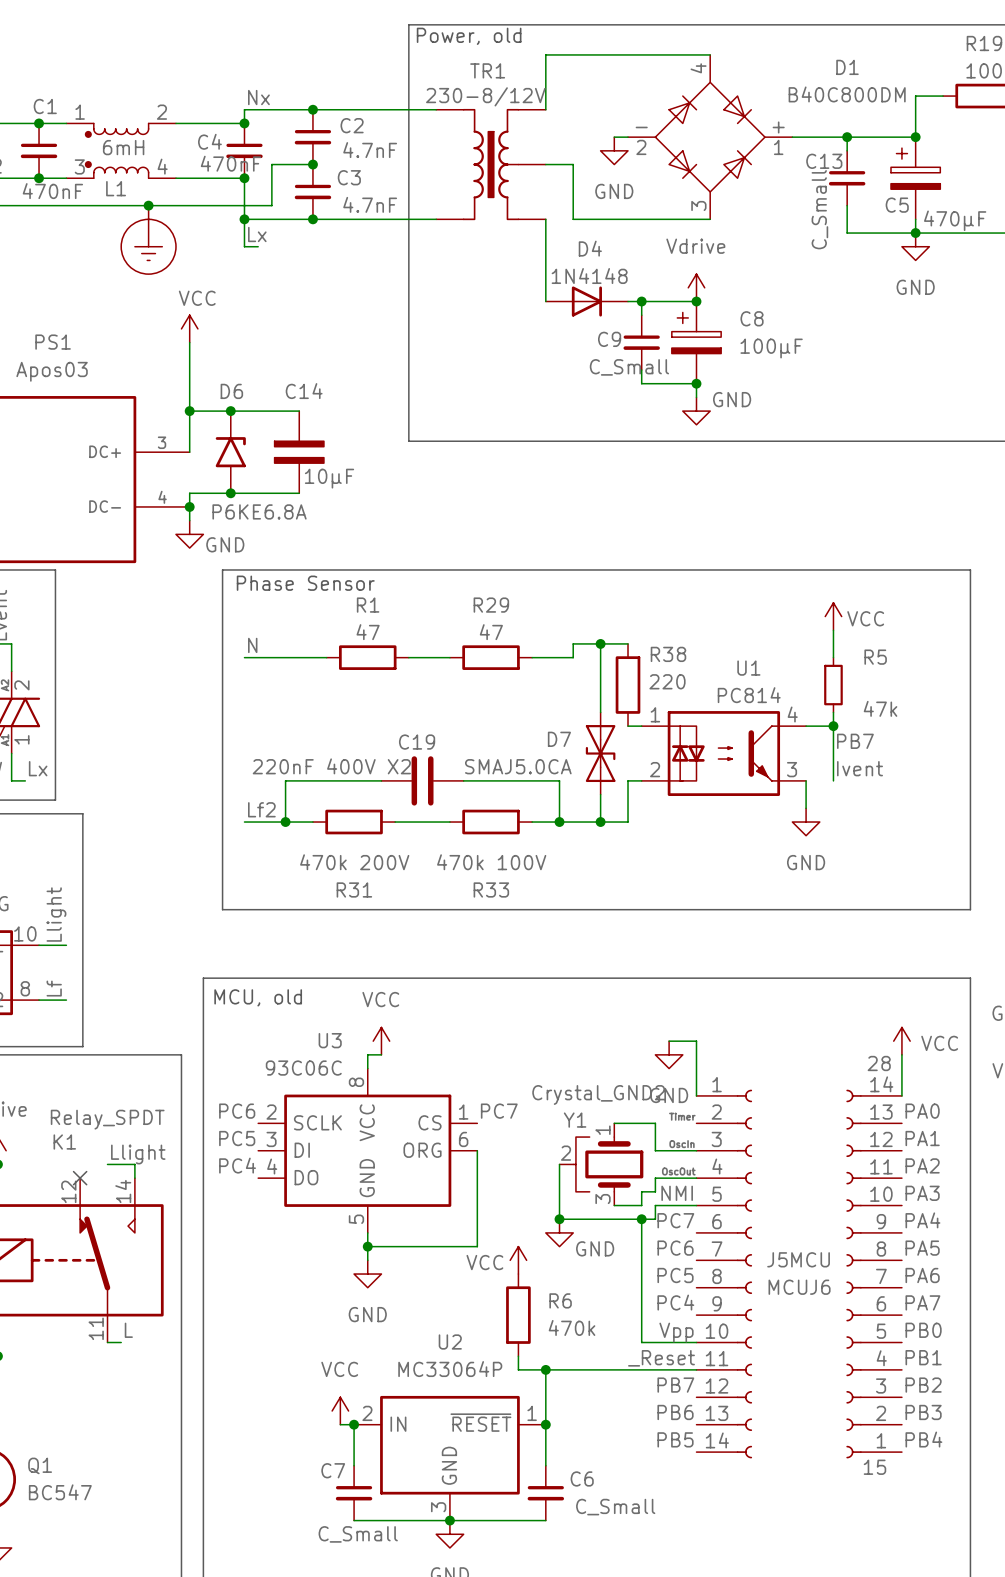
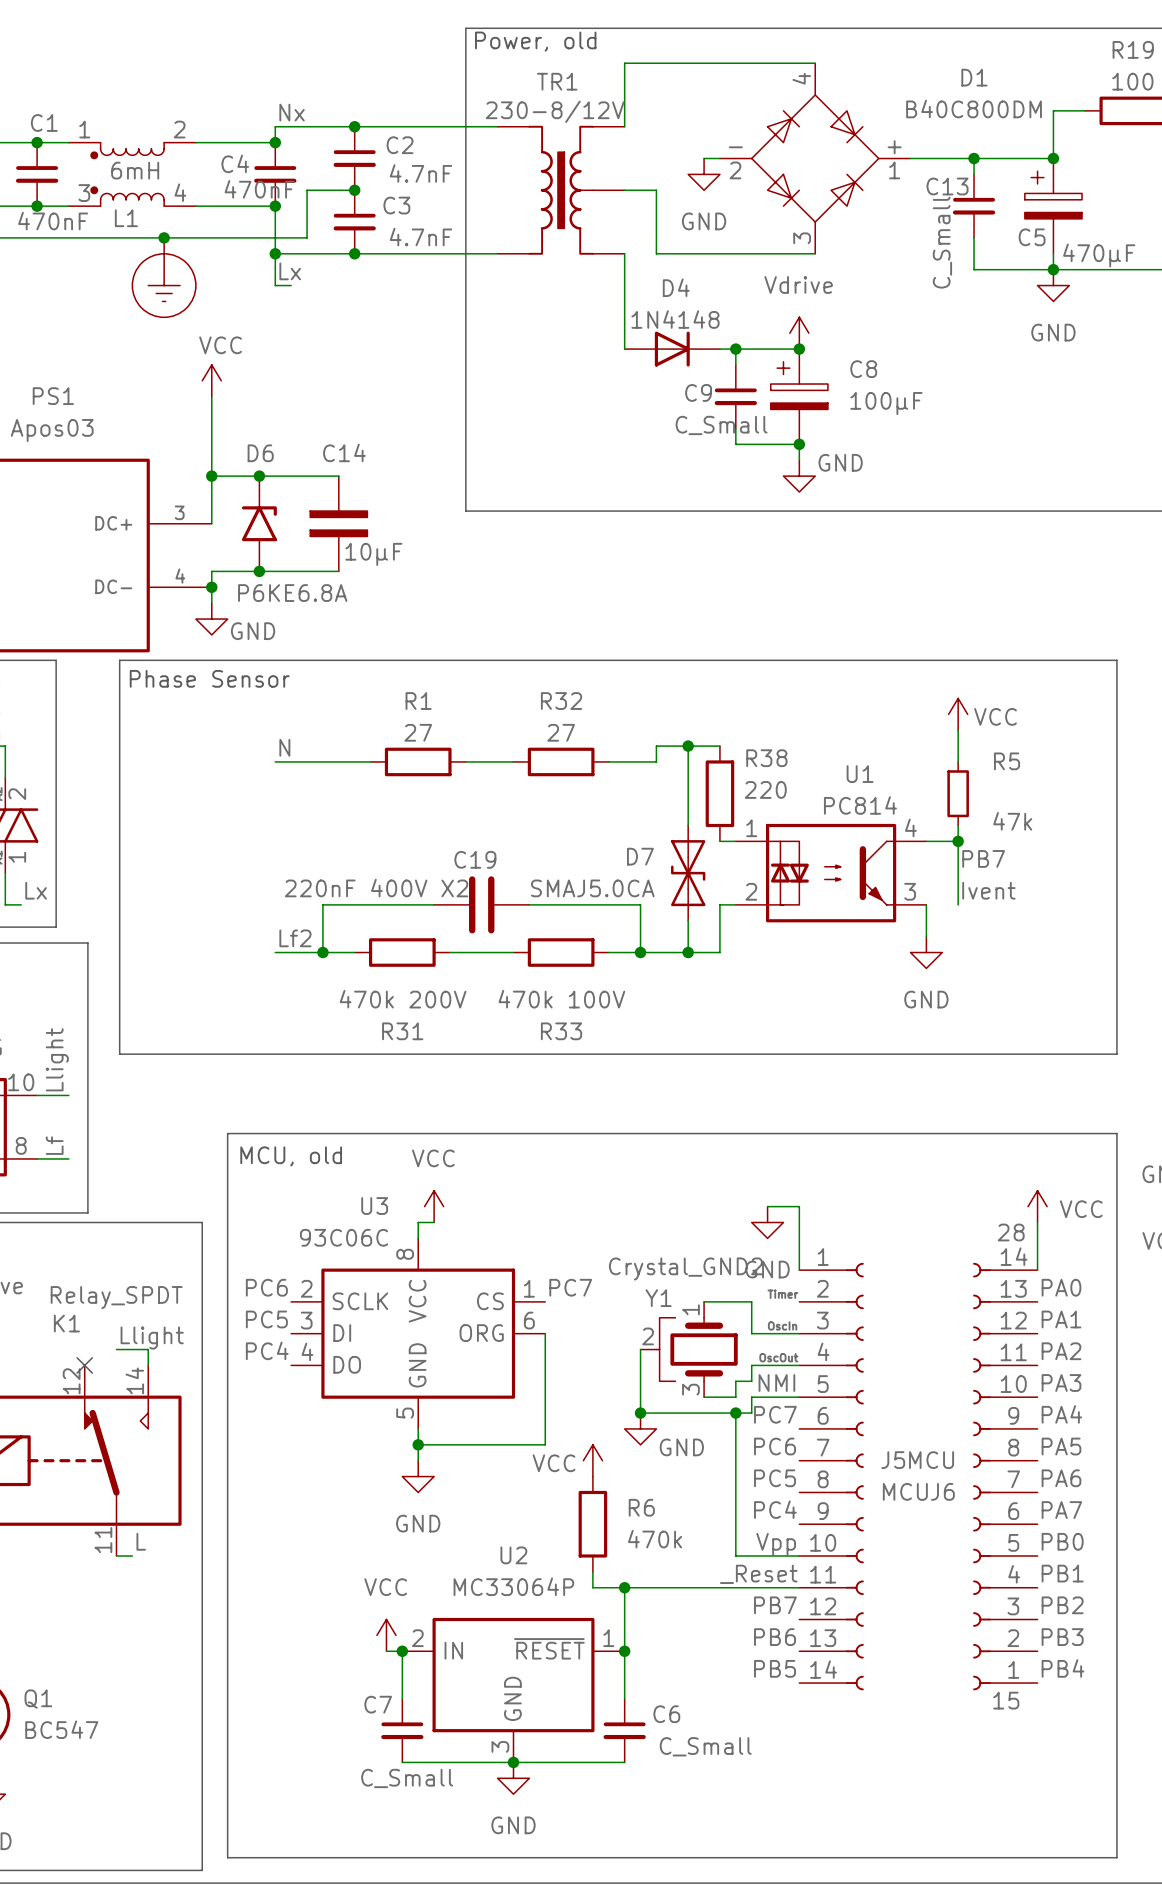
line: (222, 569) (222, 909) -> (249, 660) (119, 660) (119, 1054) (249, 1054)
text position: Phase Sensor (305, 583) -> Phase Sensor (209, 678)
R29 name: R29 (491, 605) -> R32 (561, 701)
R1 value: 47 (368, 632) -> 27 (418, 732)
R29 value: 47 (491, 632) -> 27 (561, 732)

